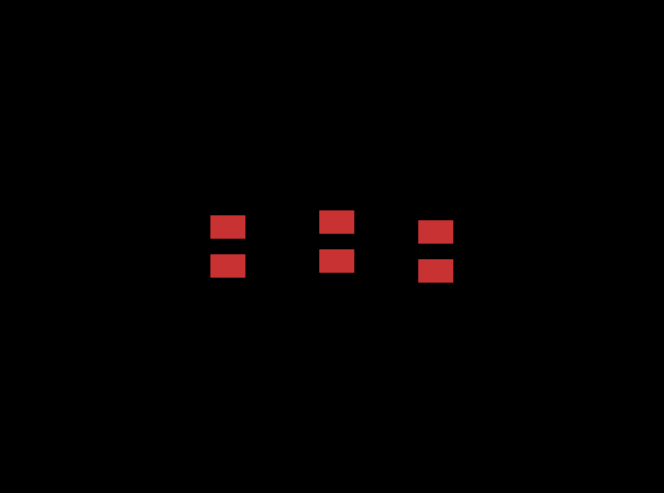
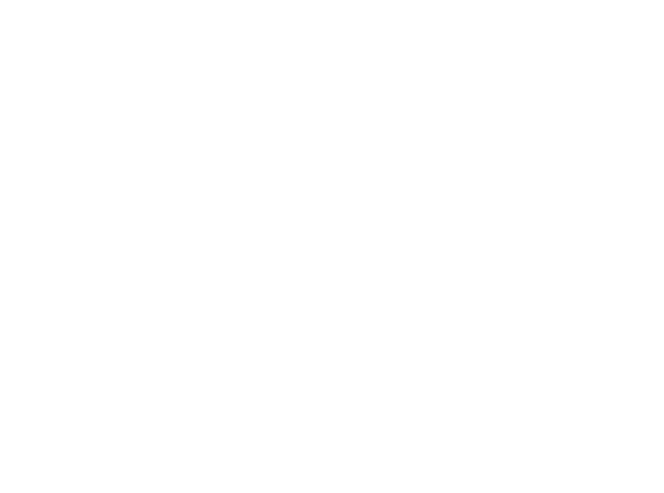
part: (336, 241) -> none
part: (227, 246) -> none
part: (435, 251) -> none

